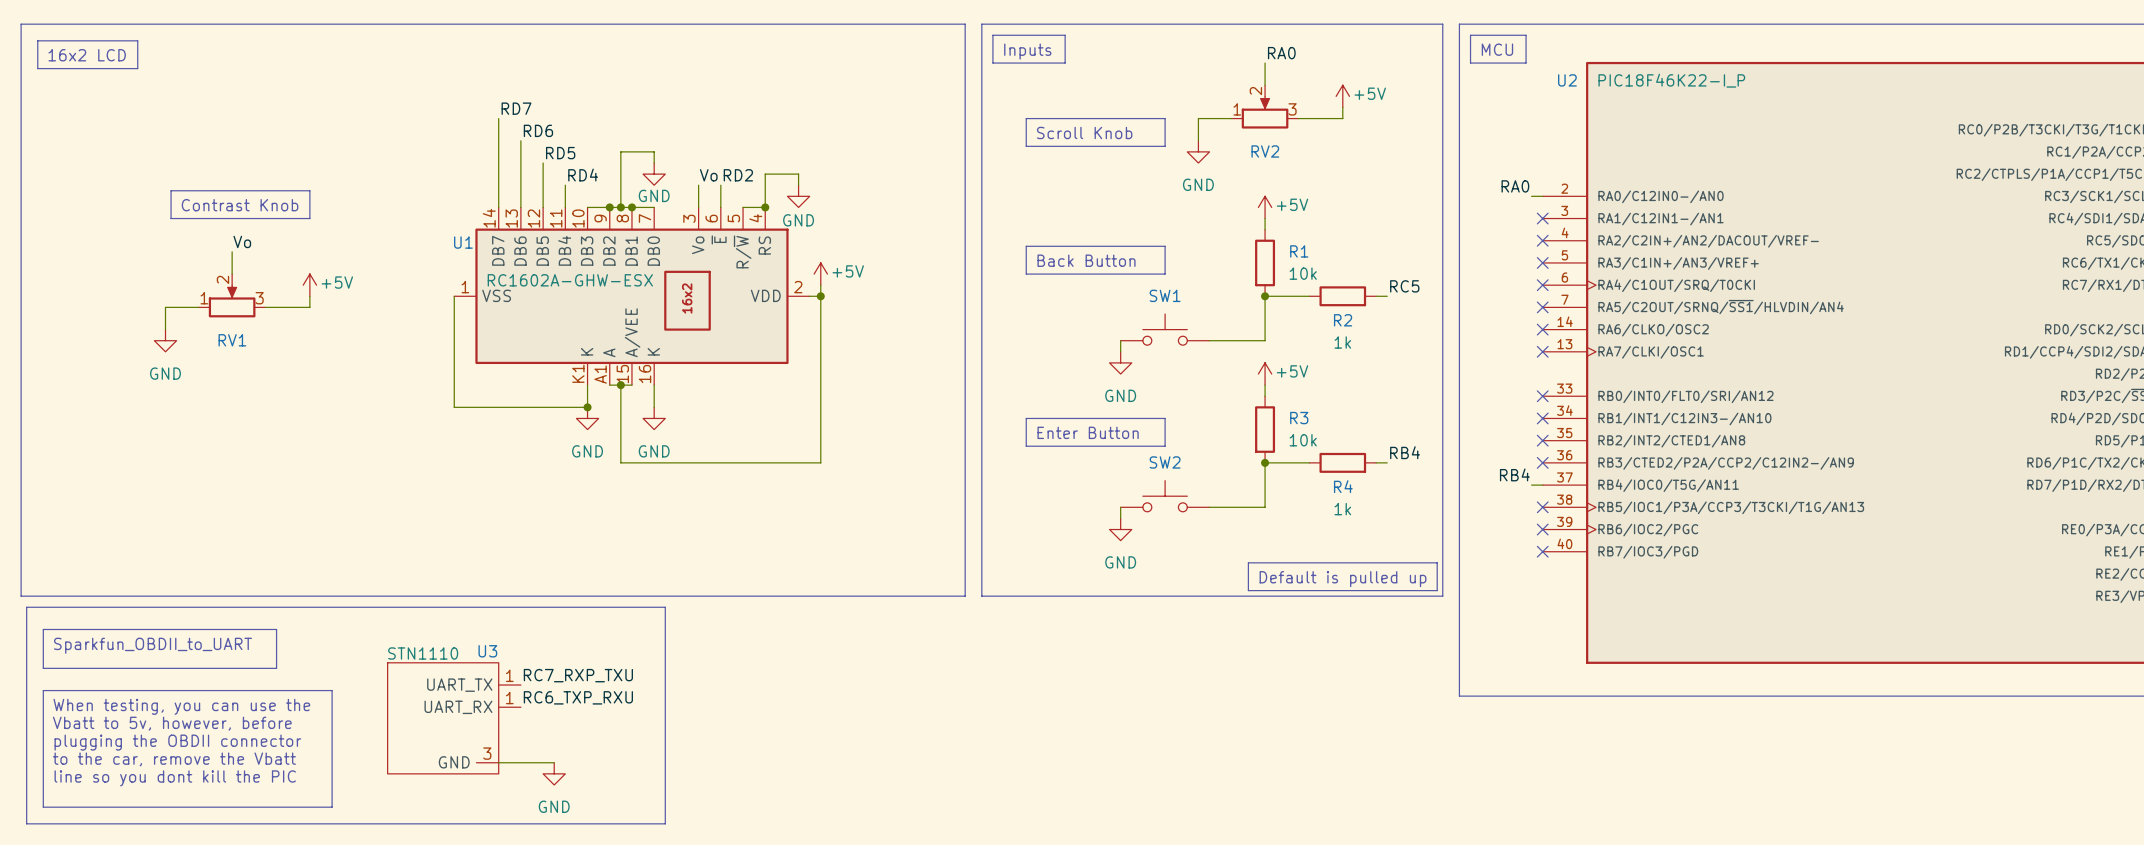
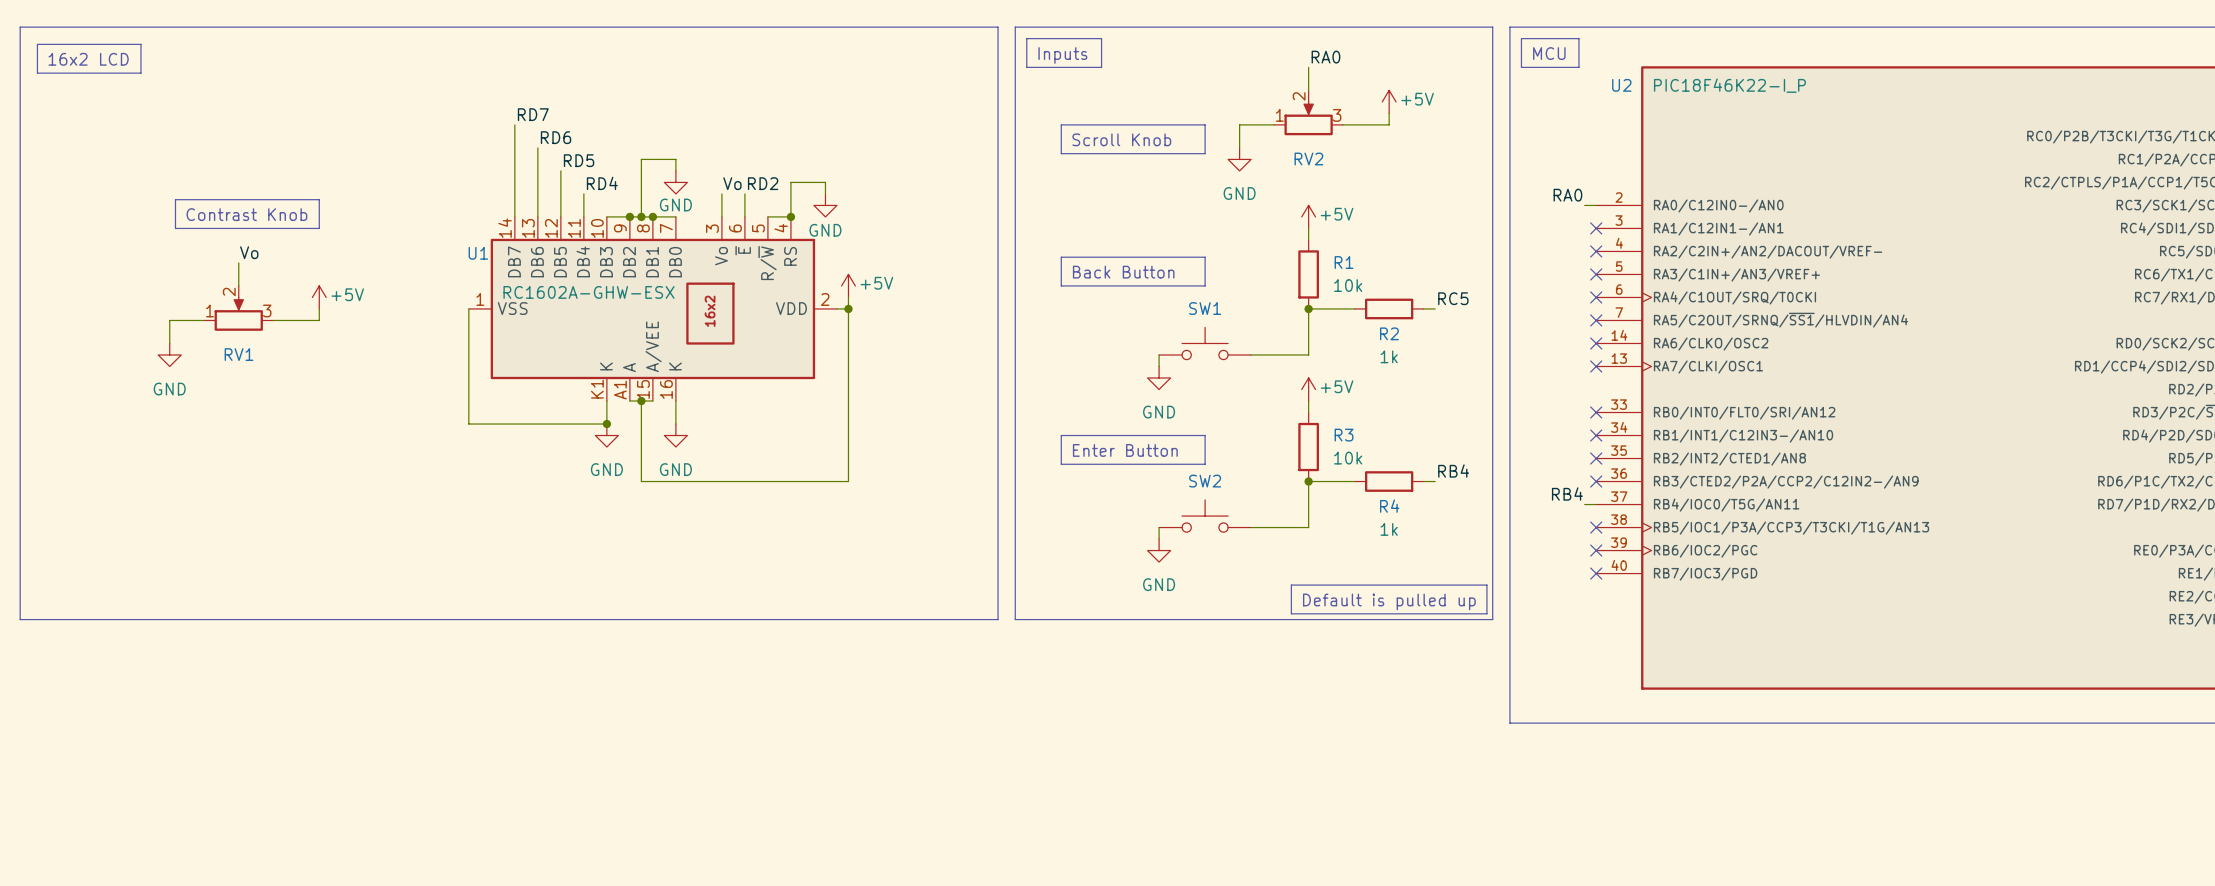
line: (26, 607) (665, 607) (665, 823) (26, 823) (26, 607) -> none
line: (43, 629) (43, 668) (276, 668) (276, 629) (43, 629) -> none
text: Sparkfun_OBDII_to_UART (153, 645) -> none
label: RC7_RXP_TXU (578, 675) -> none
line: (43, 690) (332, 690) (332, 807) (43, 807) (43, 690) -> none
label: RC6_TXP_RXU (578, 697) -> none
text: When testing, you can use the (181, 706) -> none
U3: STN1110 (454, 718) -> none
text: Vbatt to 5v, however, before (172, 723) -> none
text: plugging the OBDII connector (177, 742) -> none
text: to the car, remove the Vbatt (174, 759) -> none
wire: (498, 762) (554, 762) -> none
power symbol: GND (554, 773) -> none
text: line so you dont kill the PIC (175, 778) -> none

